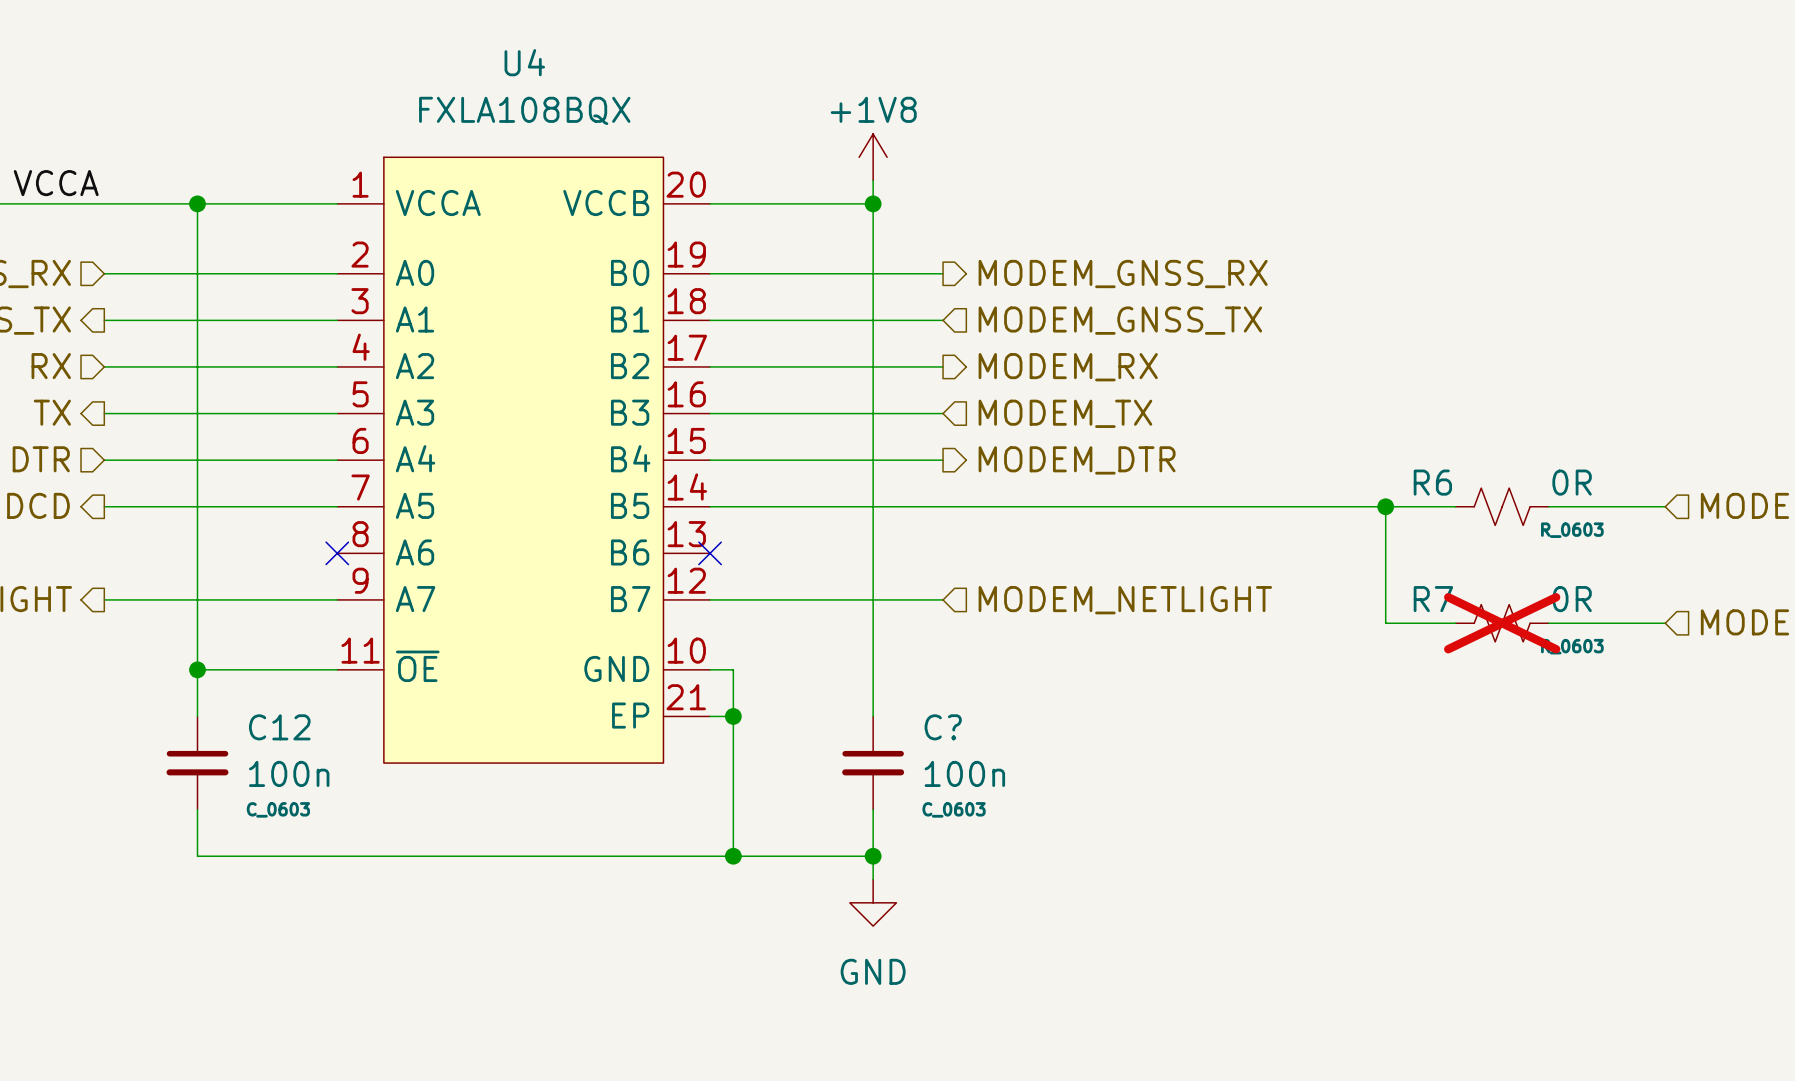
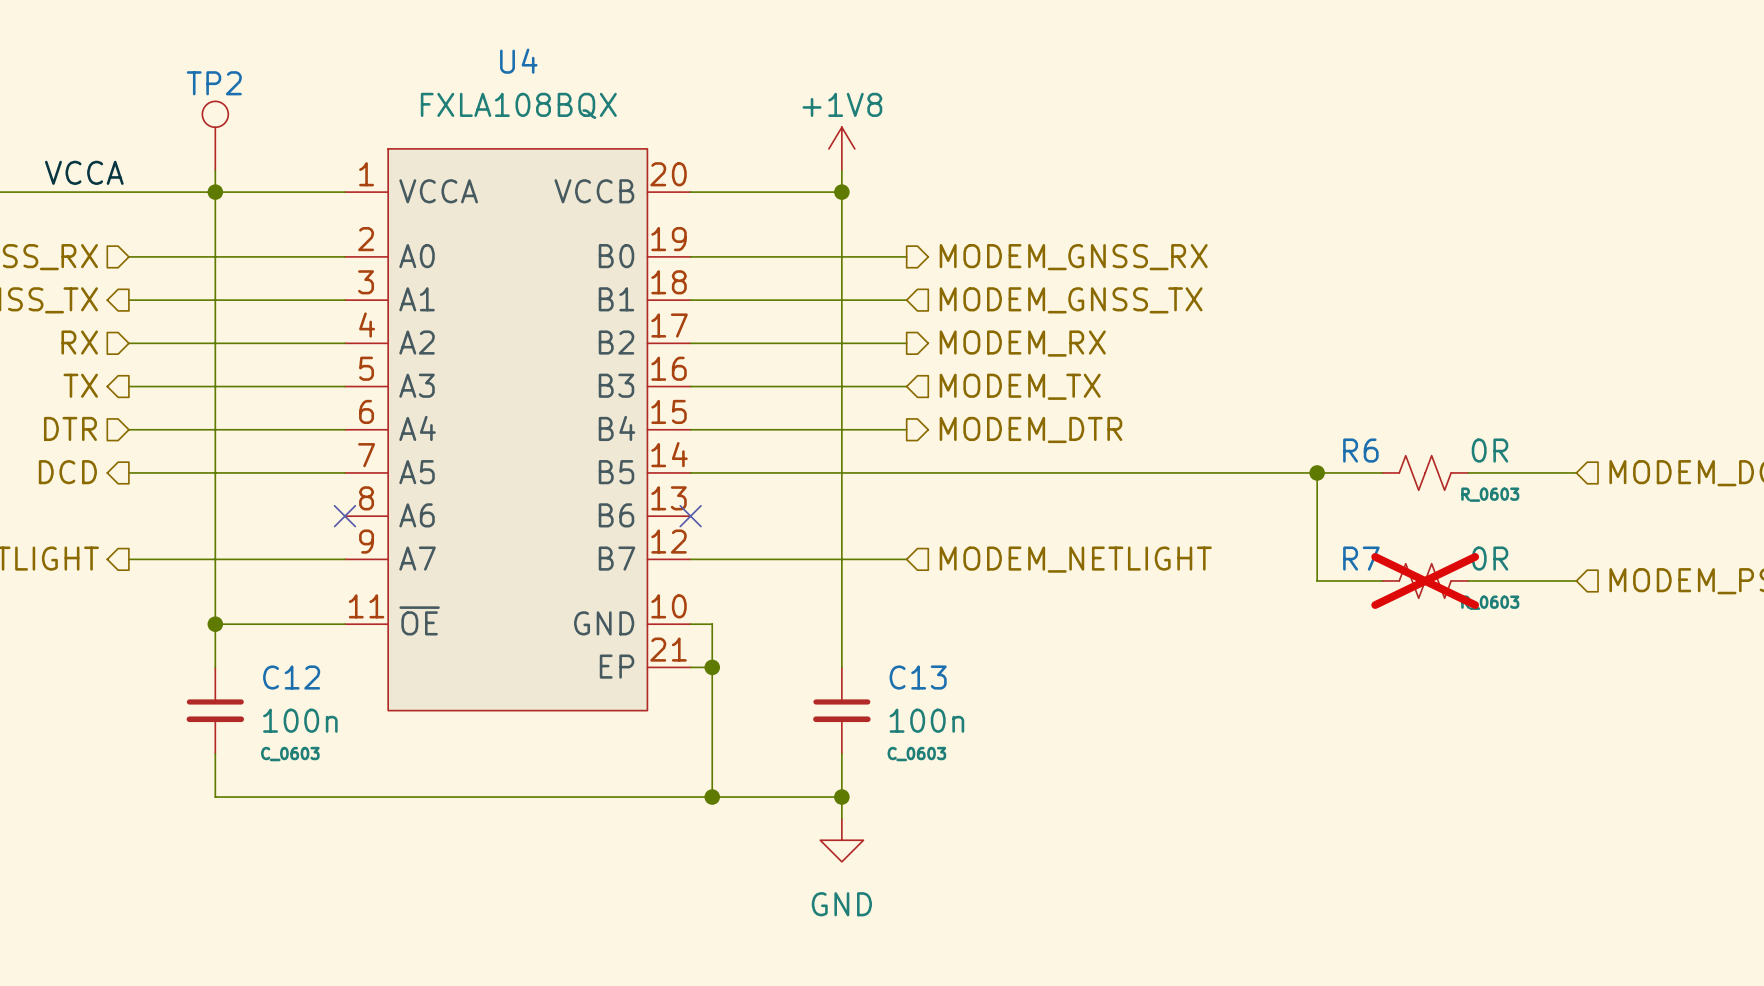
TP2: none -> (215, 135)
wire: none -> (215, 170) (215, 192)
C? name: C? (943, 727) -> C13 (918, 677)

